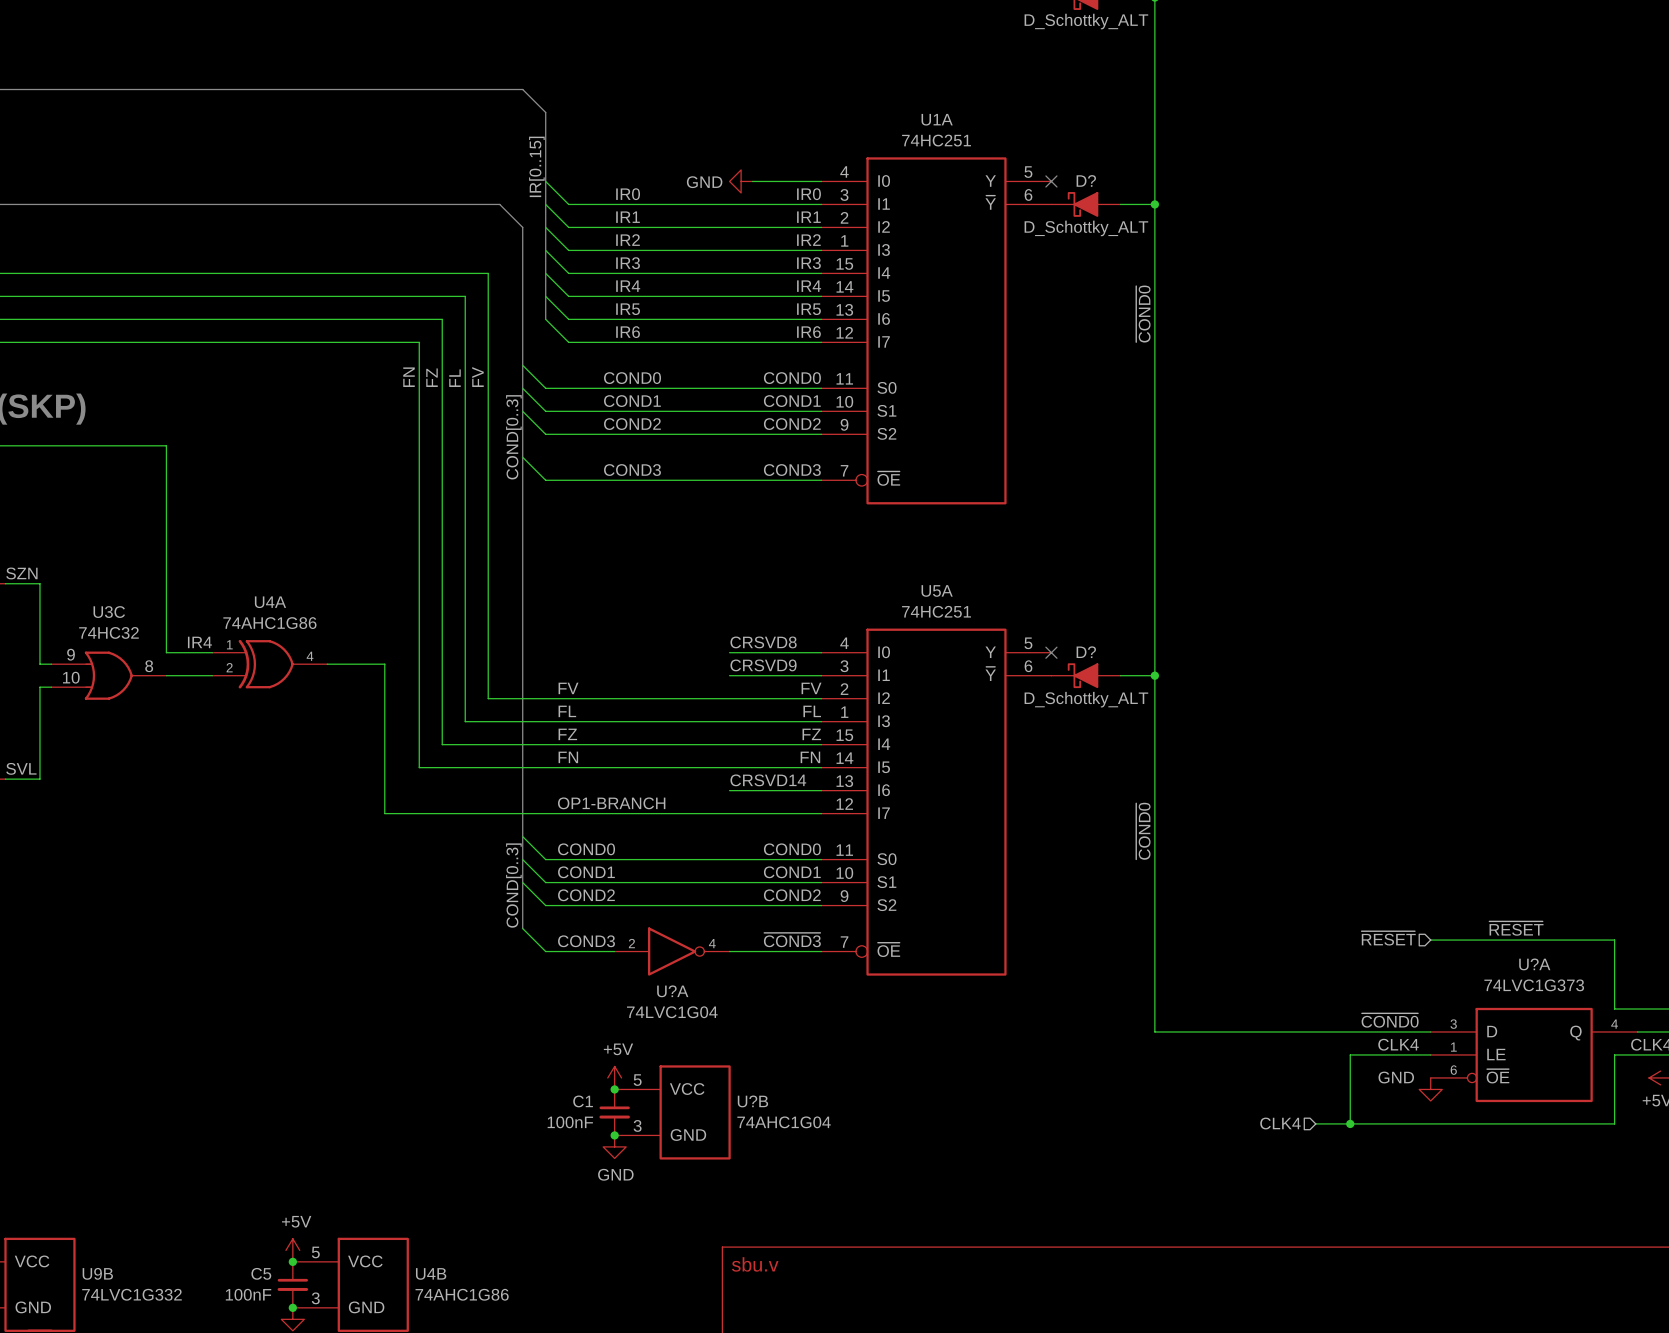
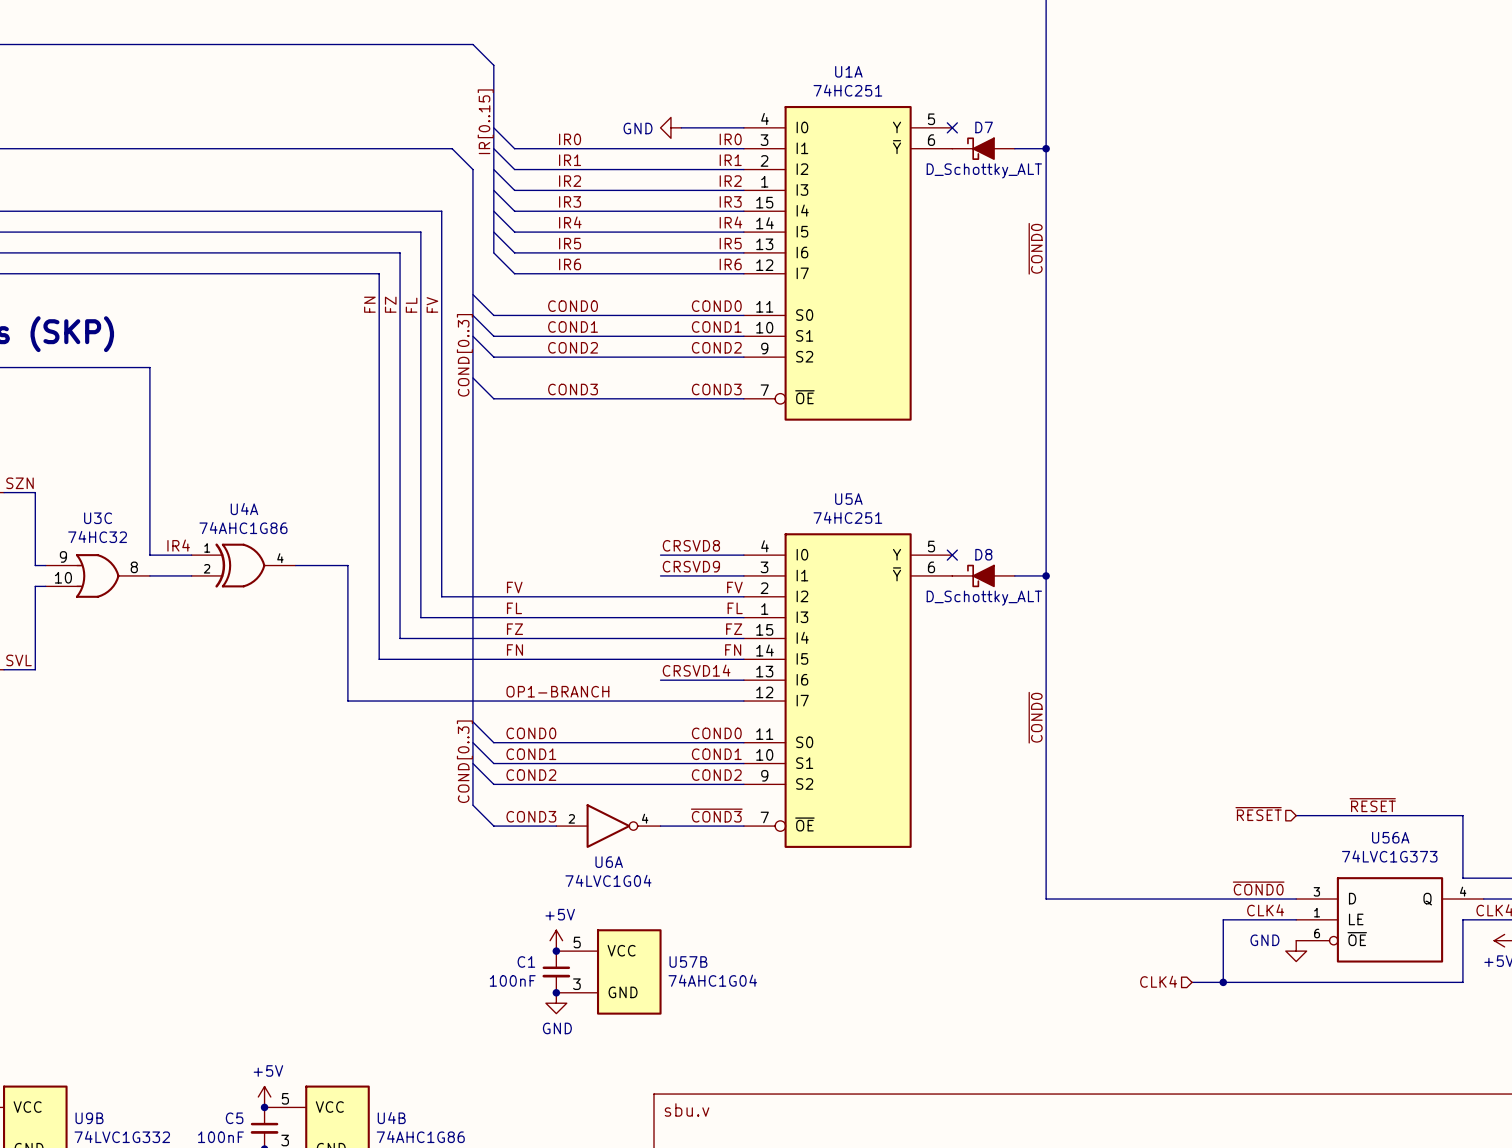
D? name: D? (1086, 180) -> D7 (984, 127)
D? name: D? (1086, 652) -> D8 (983, 554)
U?A name: U?A (1534, 964) -> U56A (1390, 837)
U?A name: U?A (672, 991) -> U6A (609, 862)
U?B name: U?B (752, 1101) -> U57B (688, 961)

